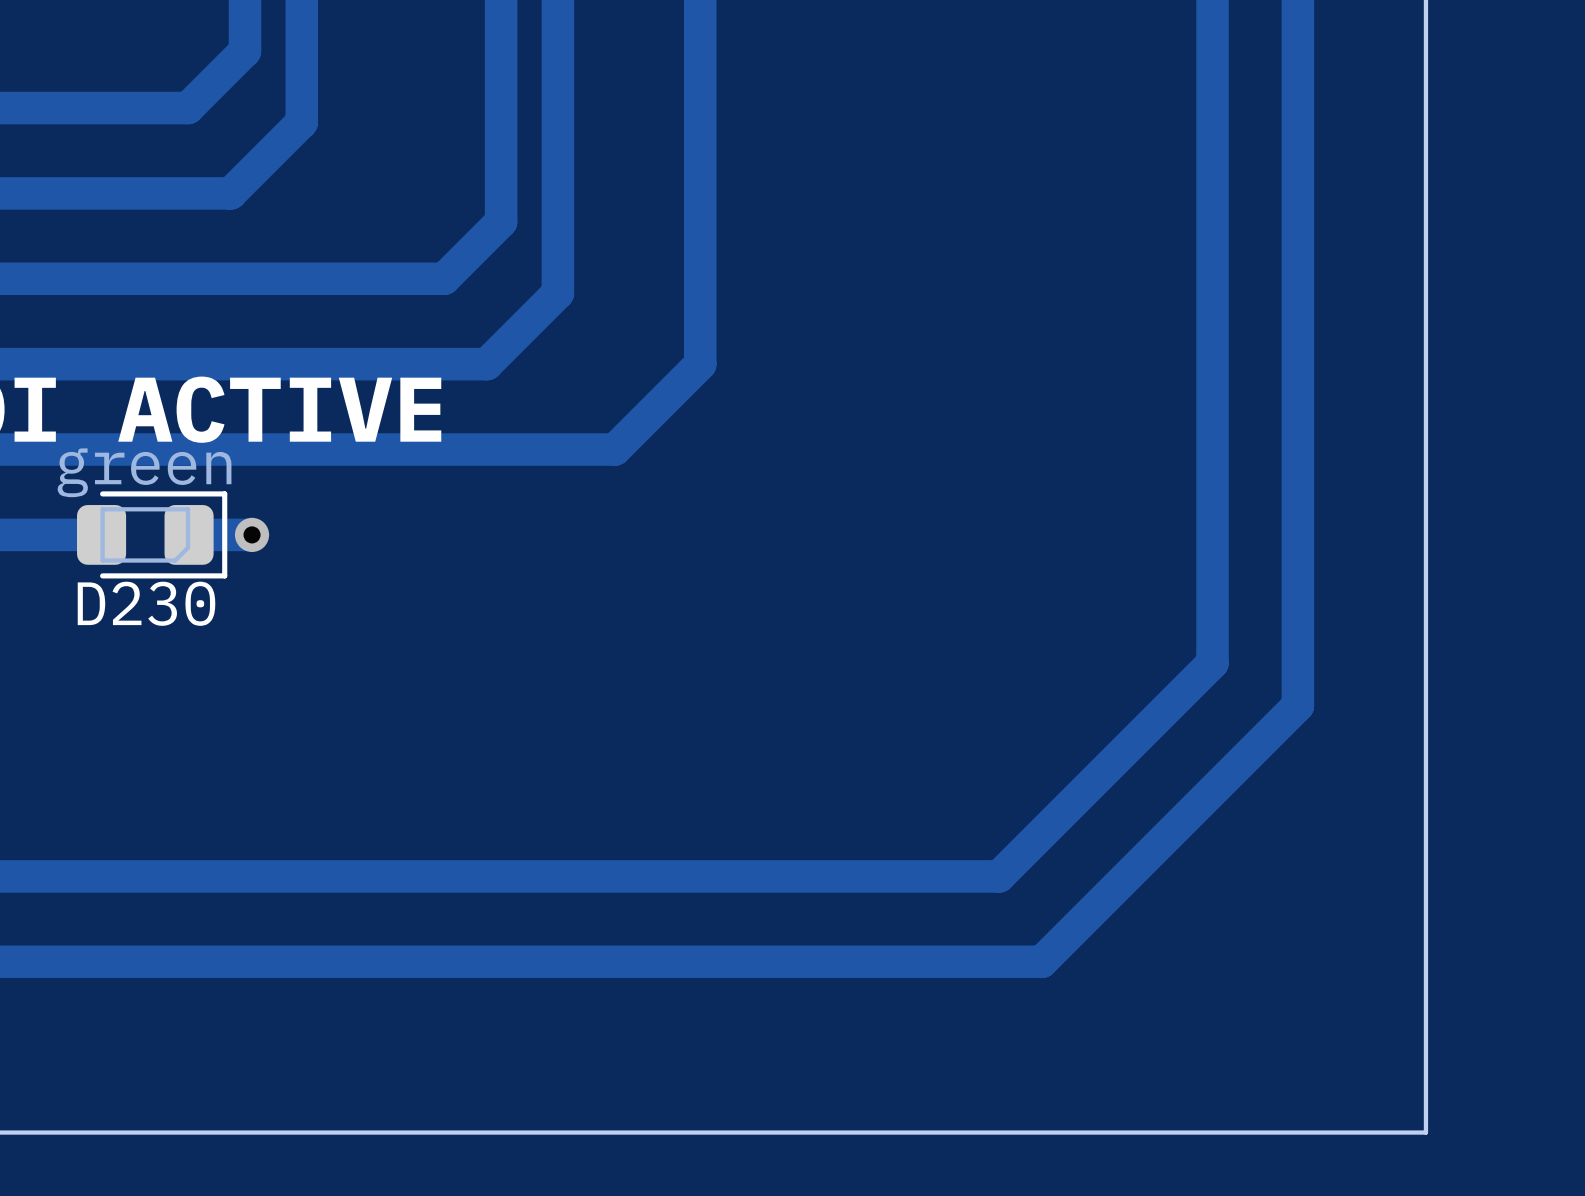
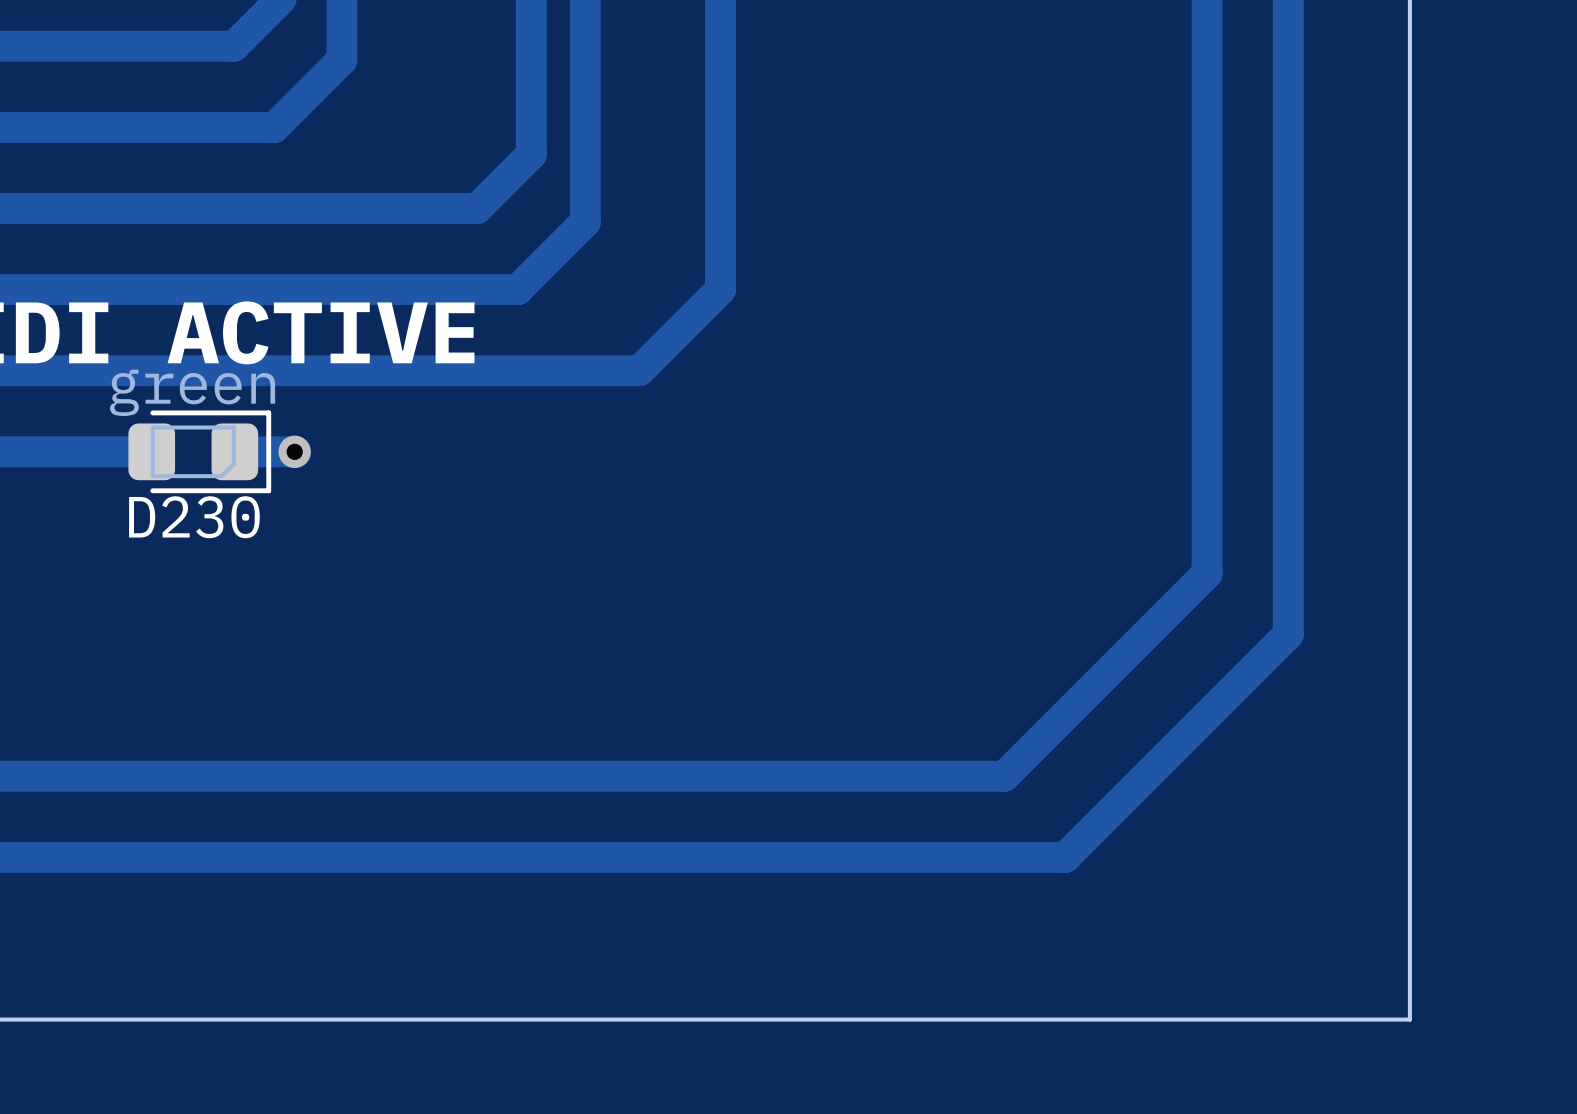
track: (1297, 705) (1041, 961) -> (1288, 614) (1288, 634) (1065, 857) (1044, 857)

